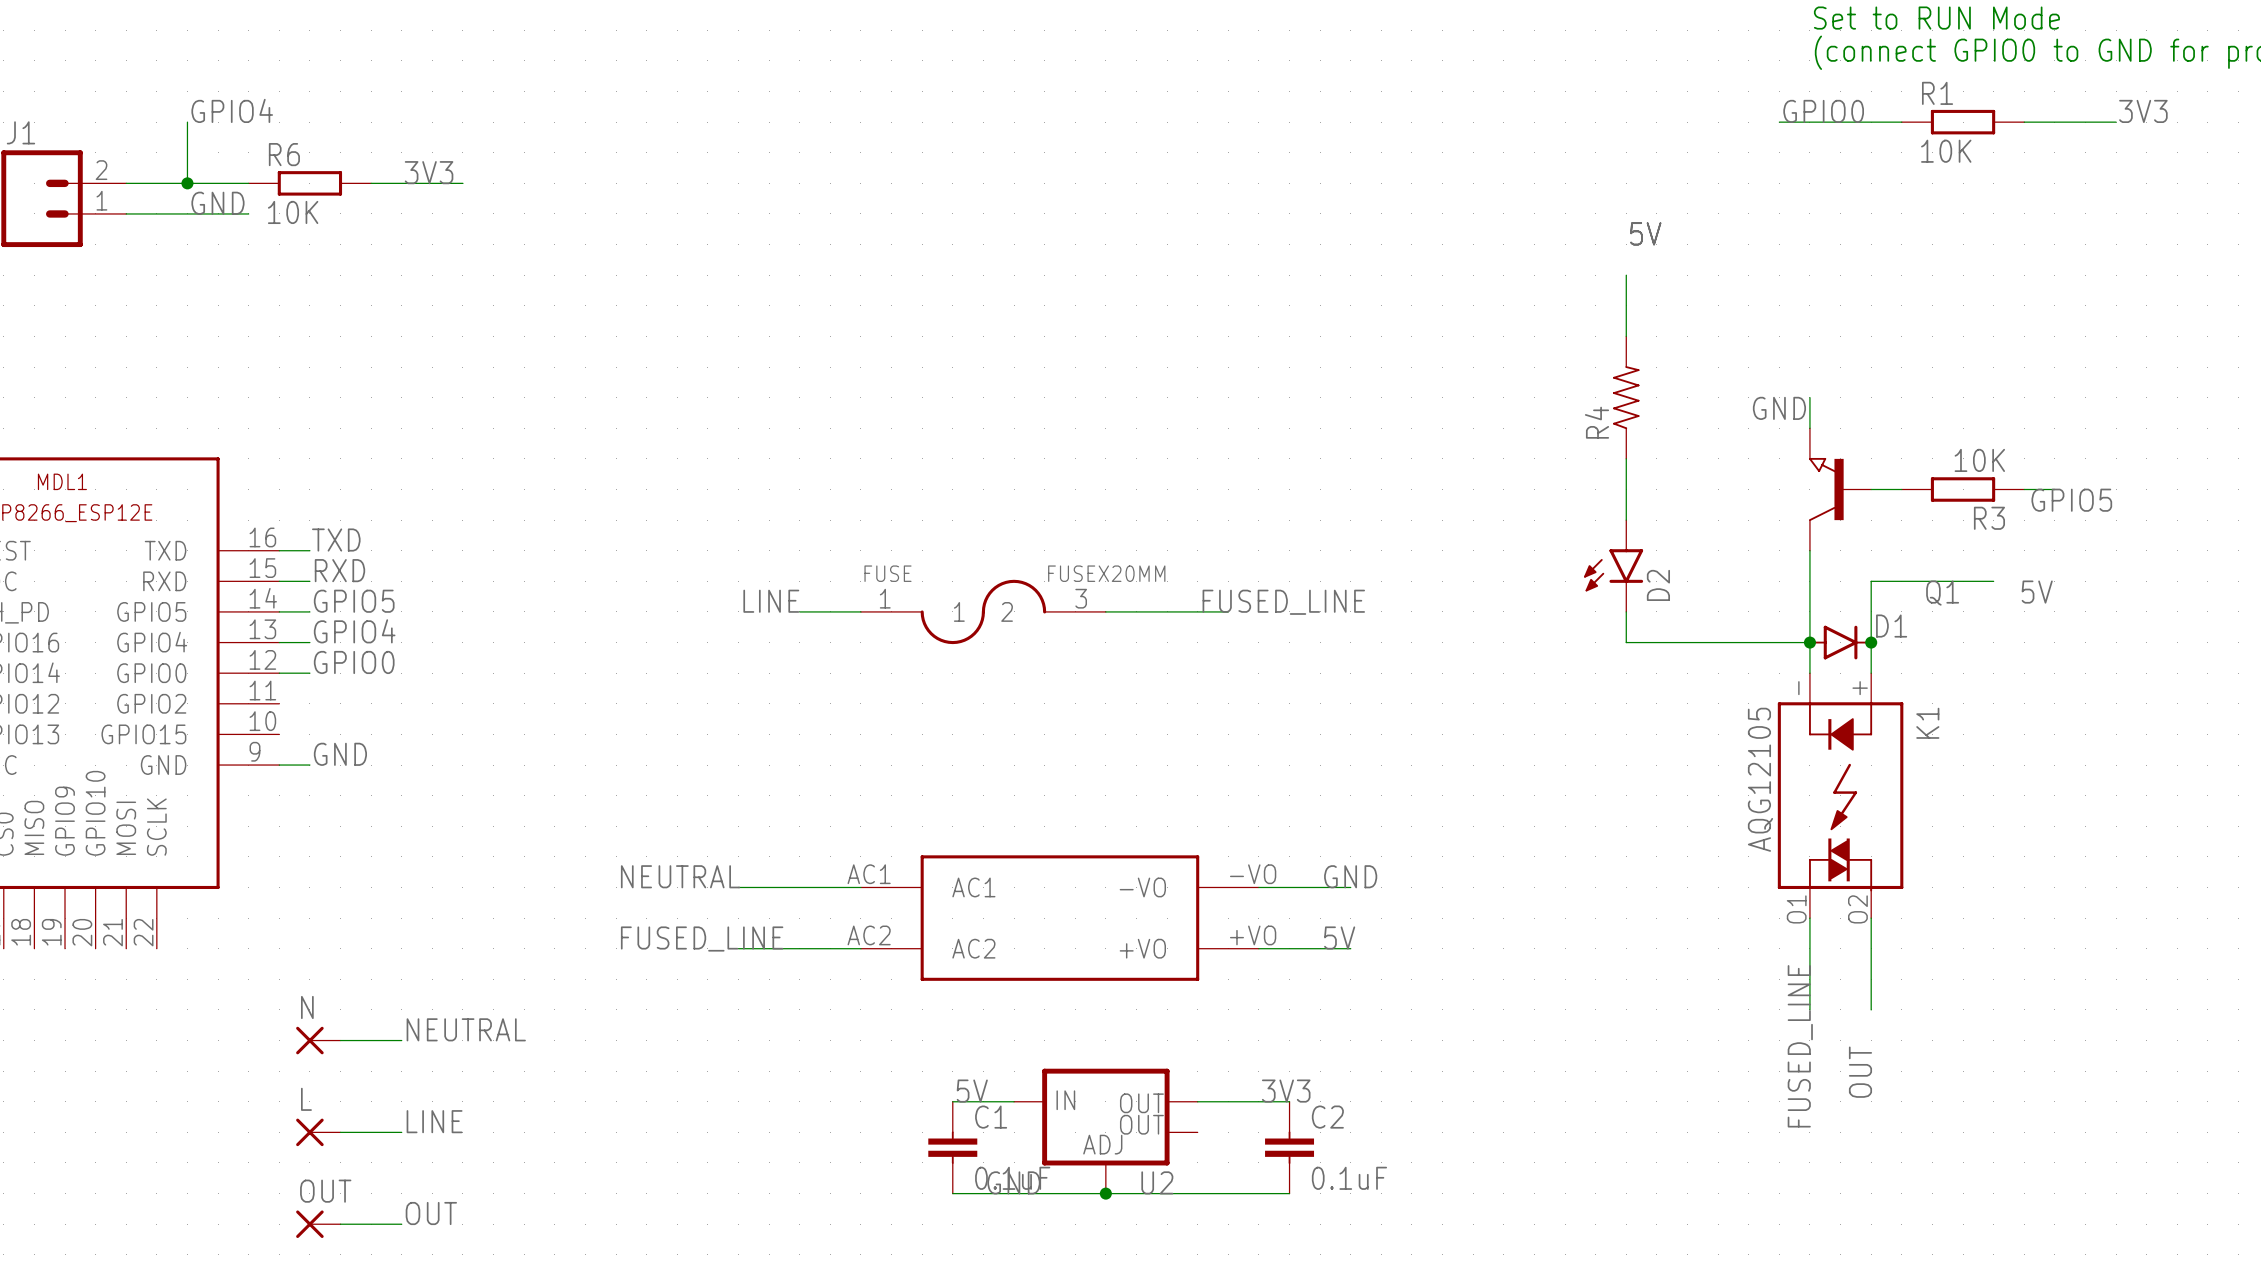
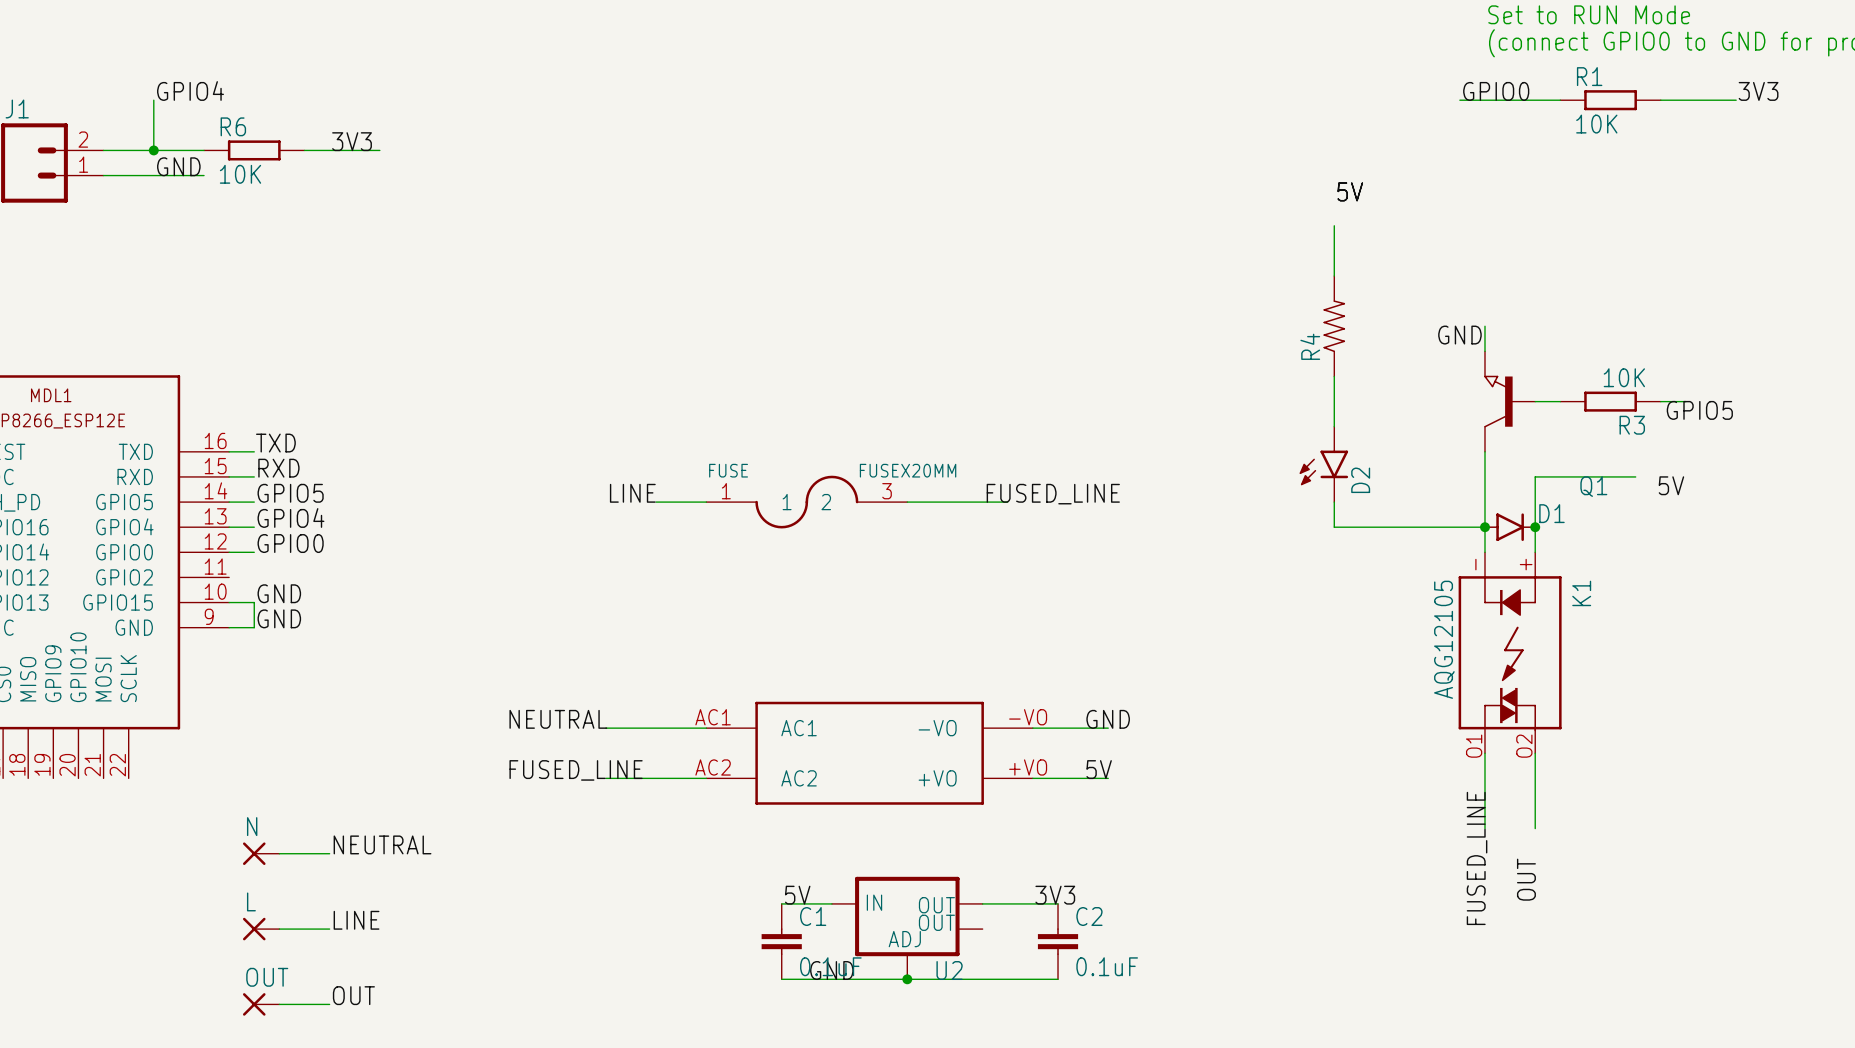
label: none -> GND (279, 593)
wire: none -> (229, 602) (254, 602) (254, 627)

